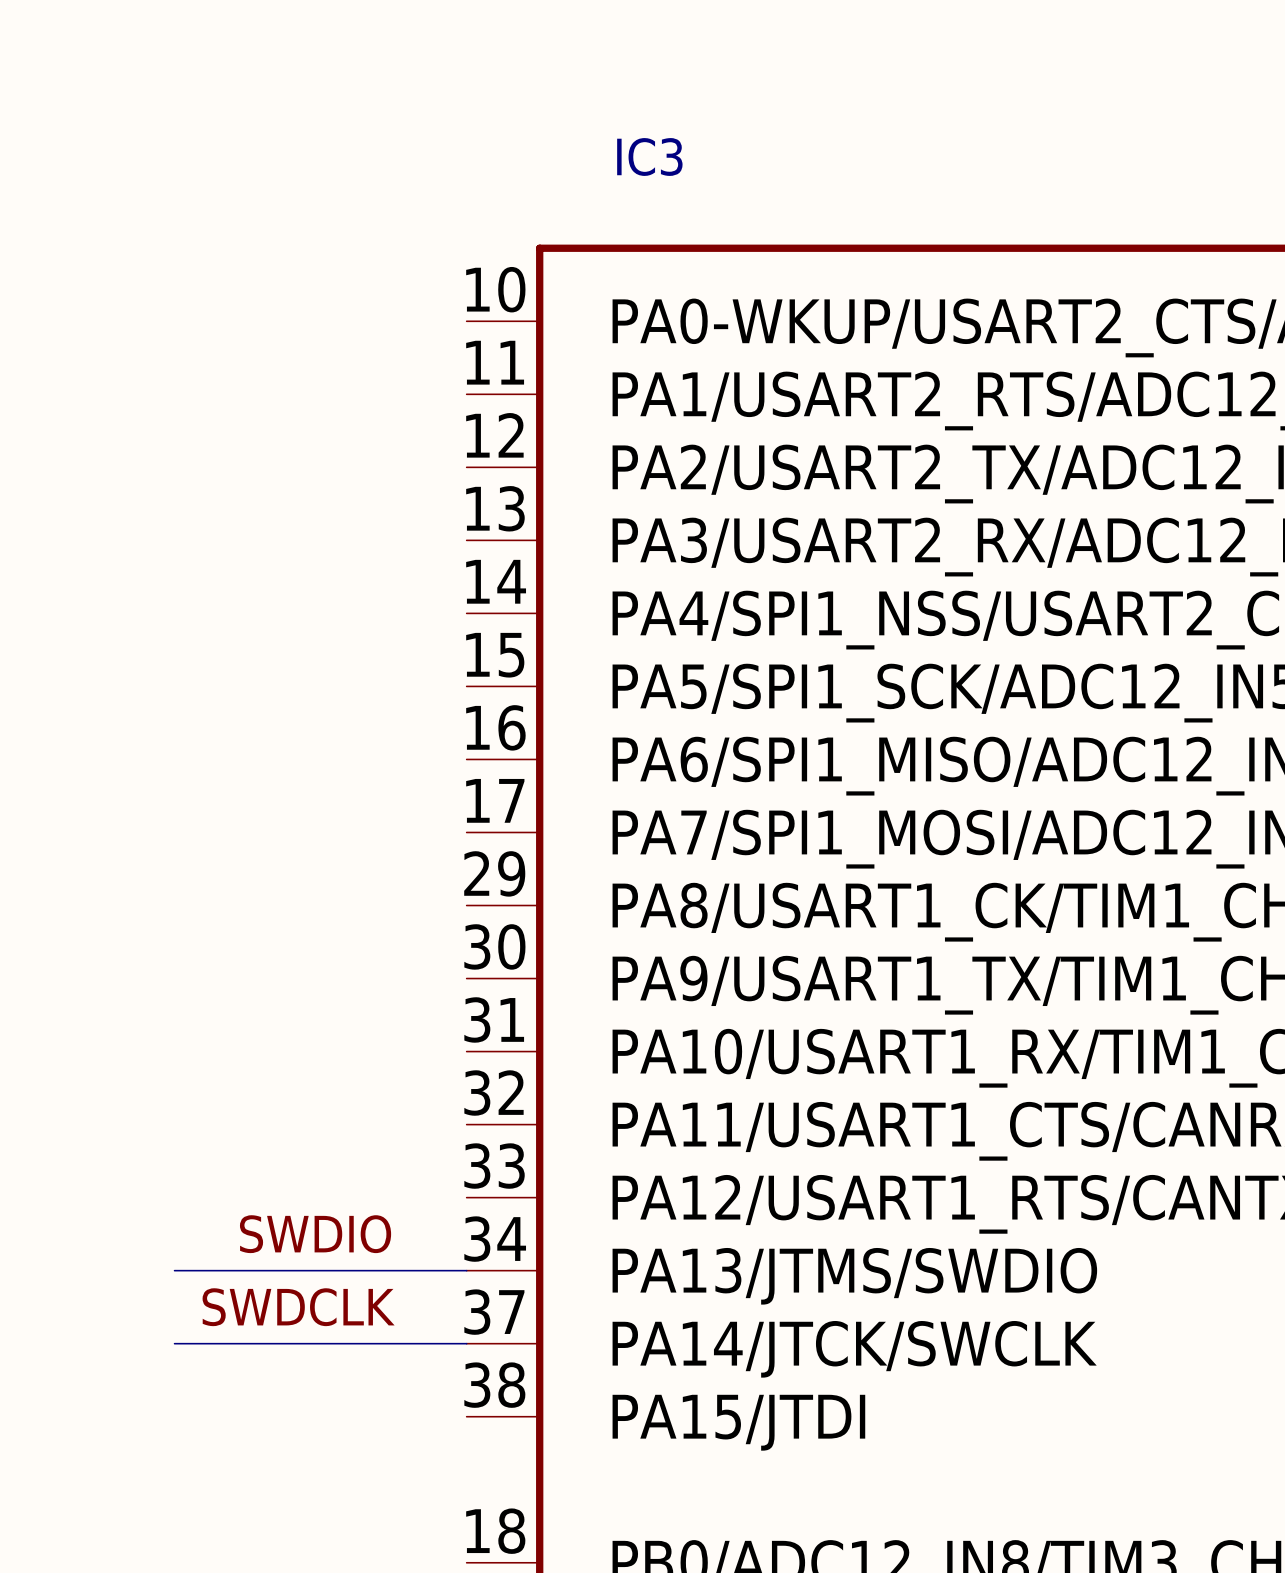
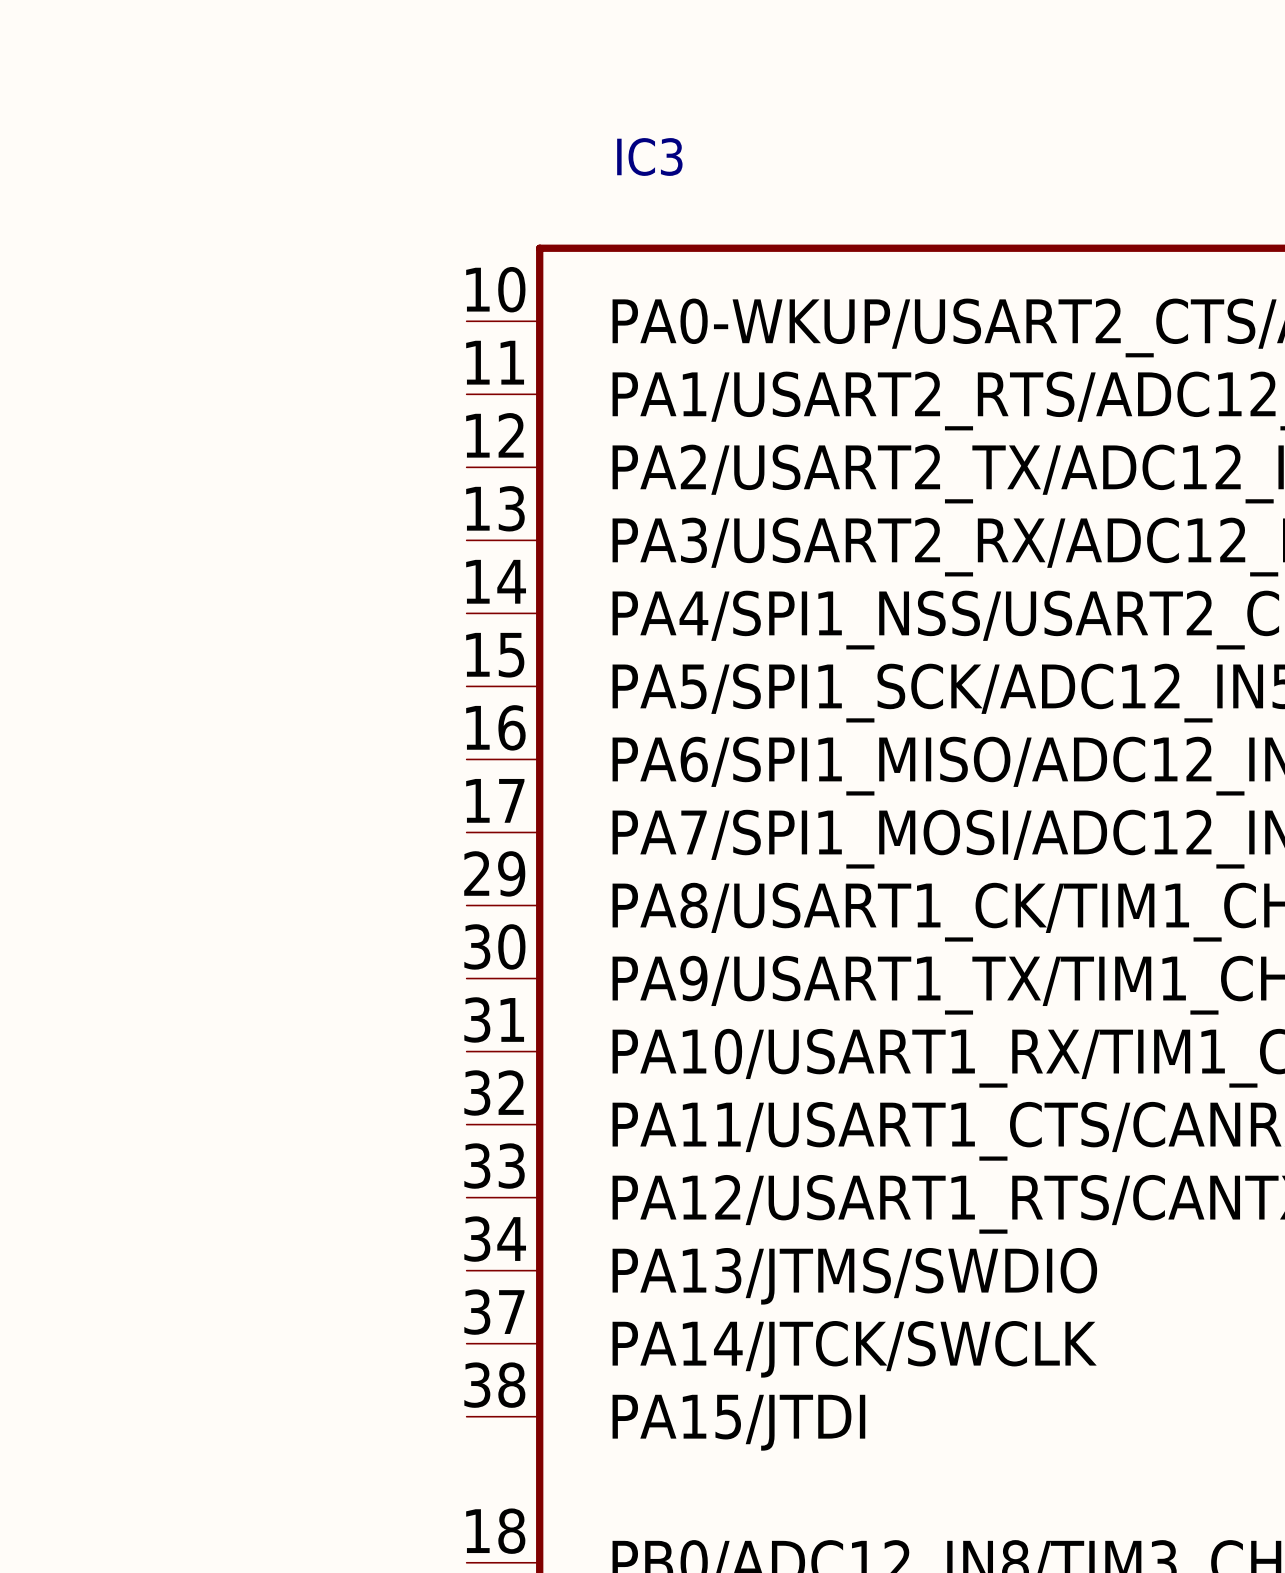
label: SWDIO (315, 1234) -> none
wire: (174, 1270) (466, 1270) -> none
label: SWDCLK (298, 1307) -> none
wire: (174, 1343) (466, 1343) -> none

